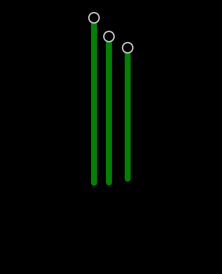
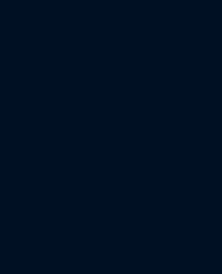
track: (93, 17) (93, 182) -> none
via: (93, 17) -> none
track: (108, 36) (108, 182) -> none
via: (108, 36) -> none
track: (127, 47) (127, 178) -> none
via: (127, 47) -> none

